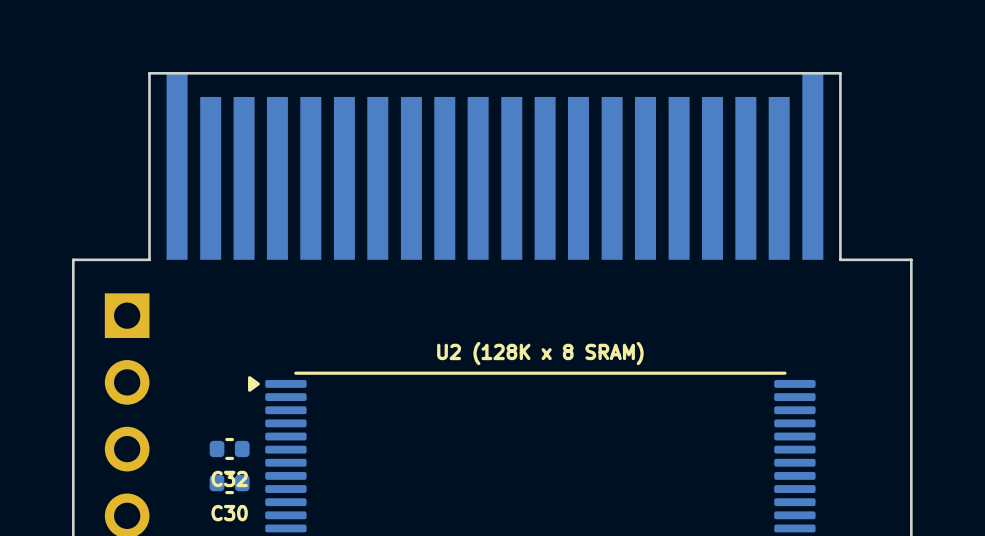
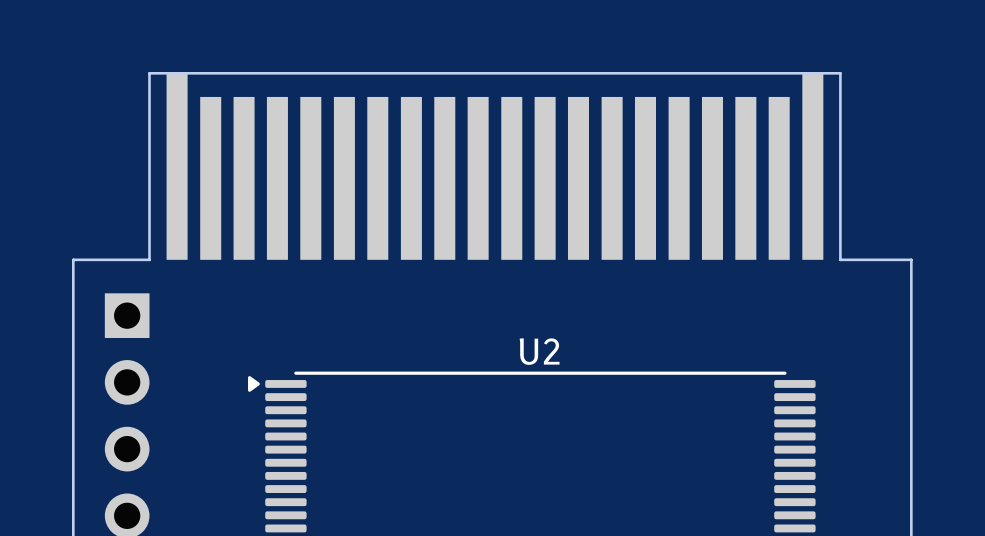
U2 name: none -> U2 (539, 351)
U2 text: U2 (128K x 8 SRAM) (540, 353) -> none
C32: (229, 448) -> none
C30: (229, 483) -> none

